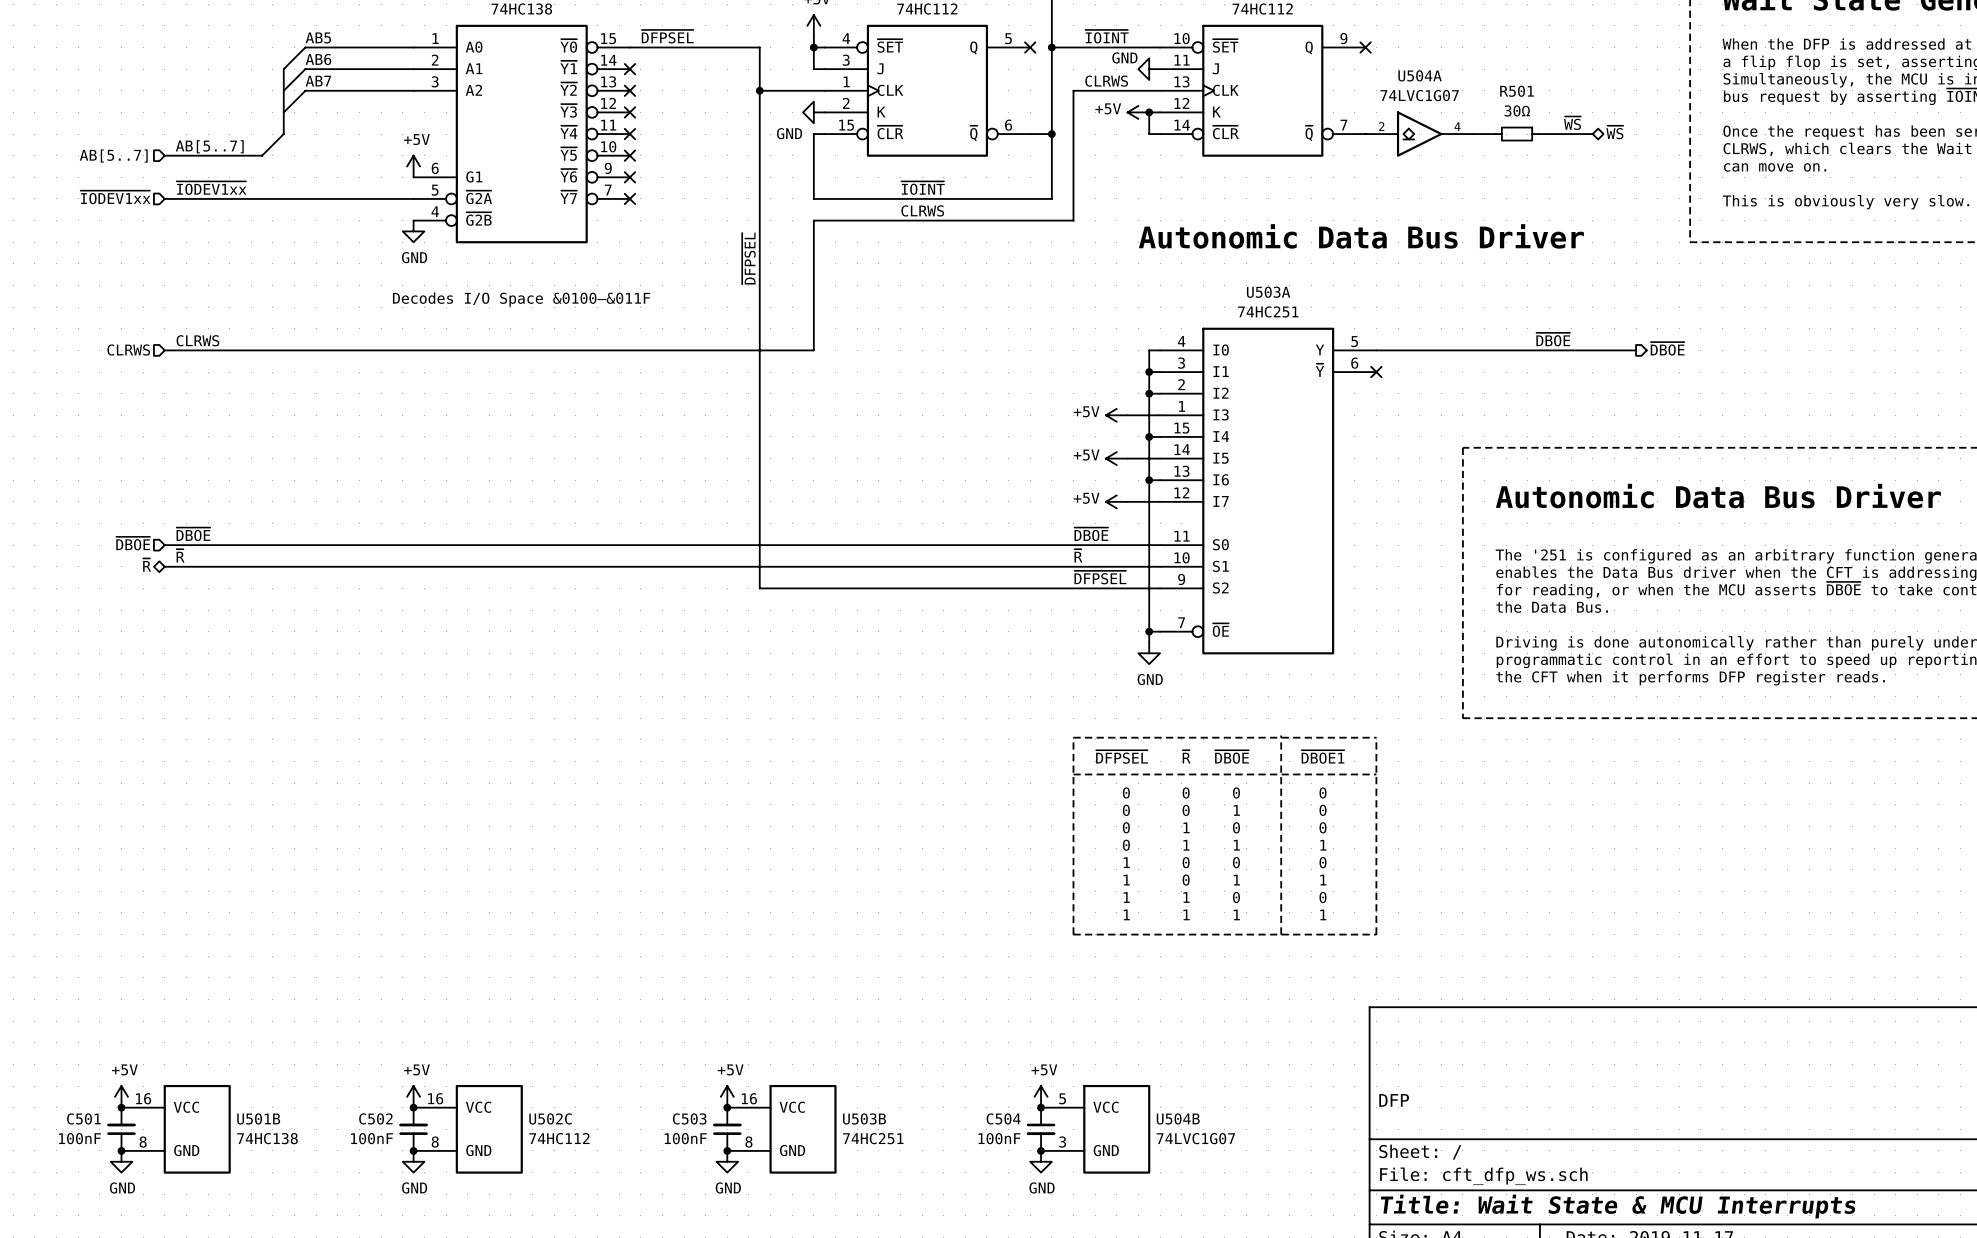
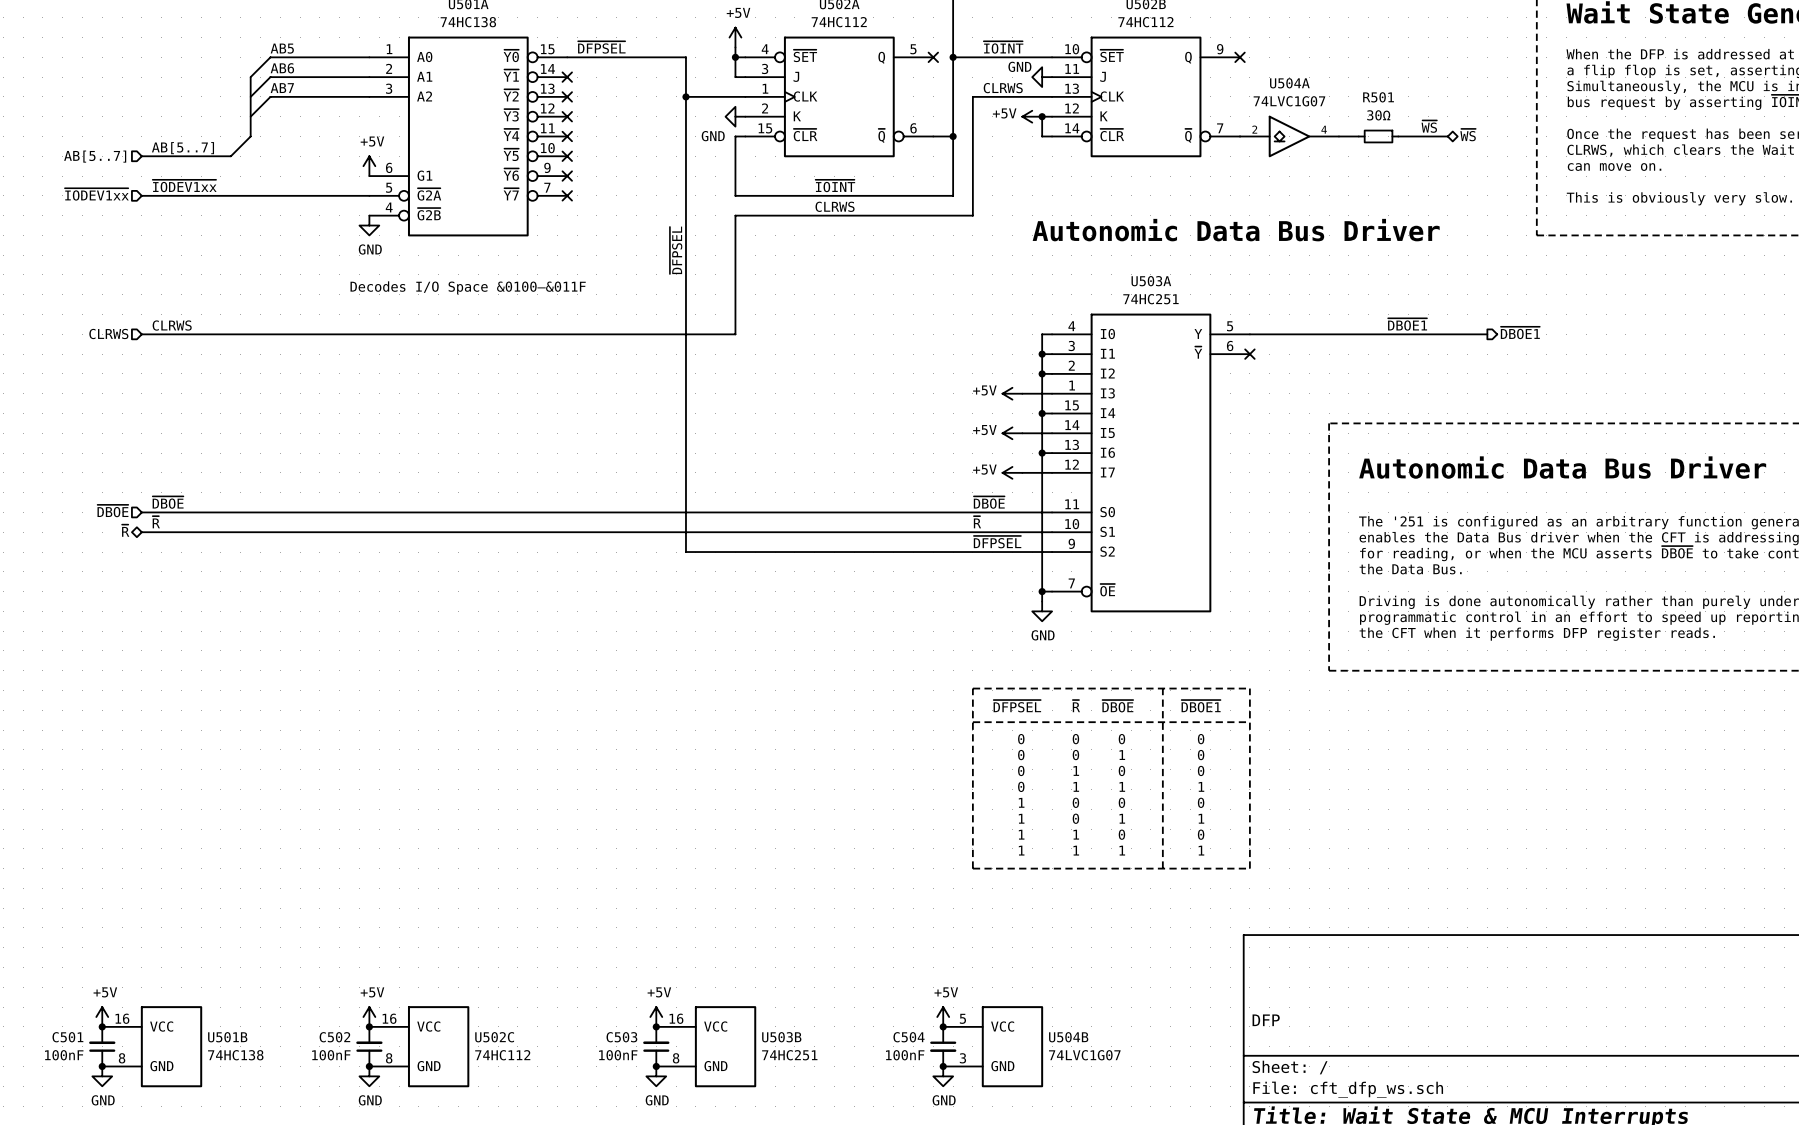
label: ~{DBOE} (1553, 339) -> ~{DBOE1} (1407, 324)
hierarchical label: ~{DBOE} (1667, 348) -> ~{DBOE1} (1520, 332)

